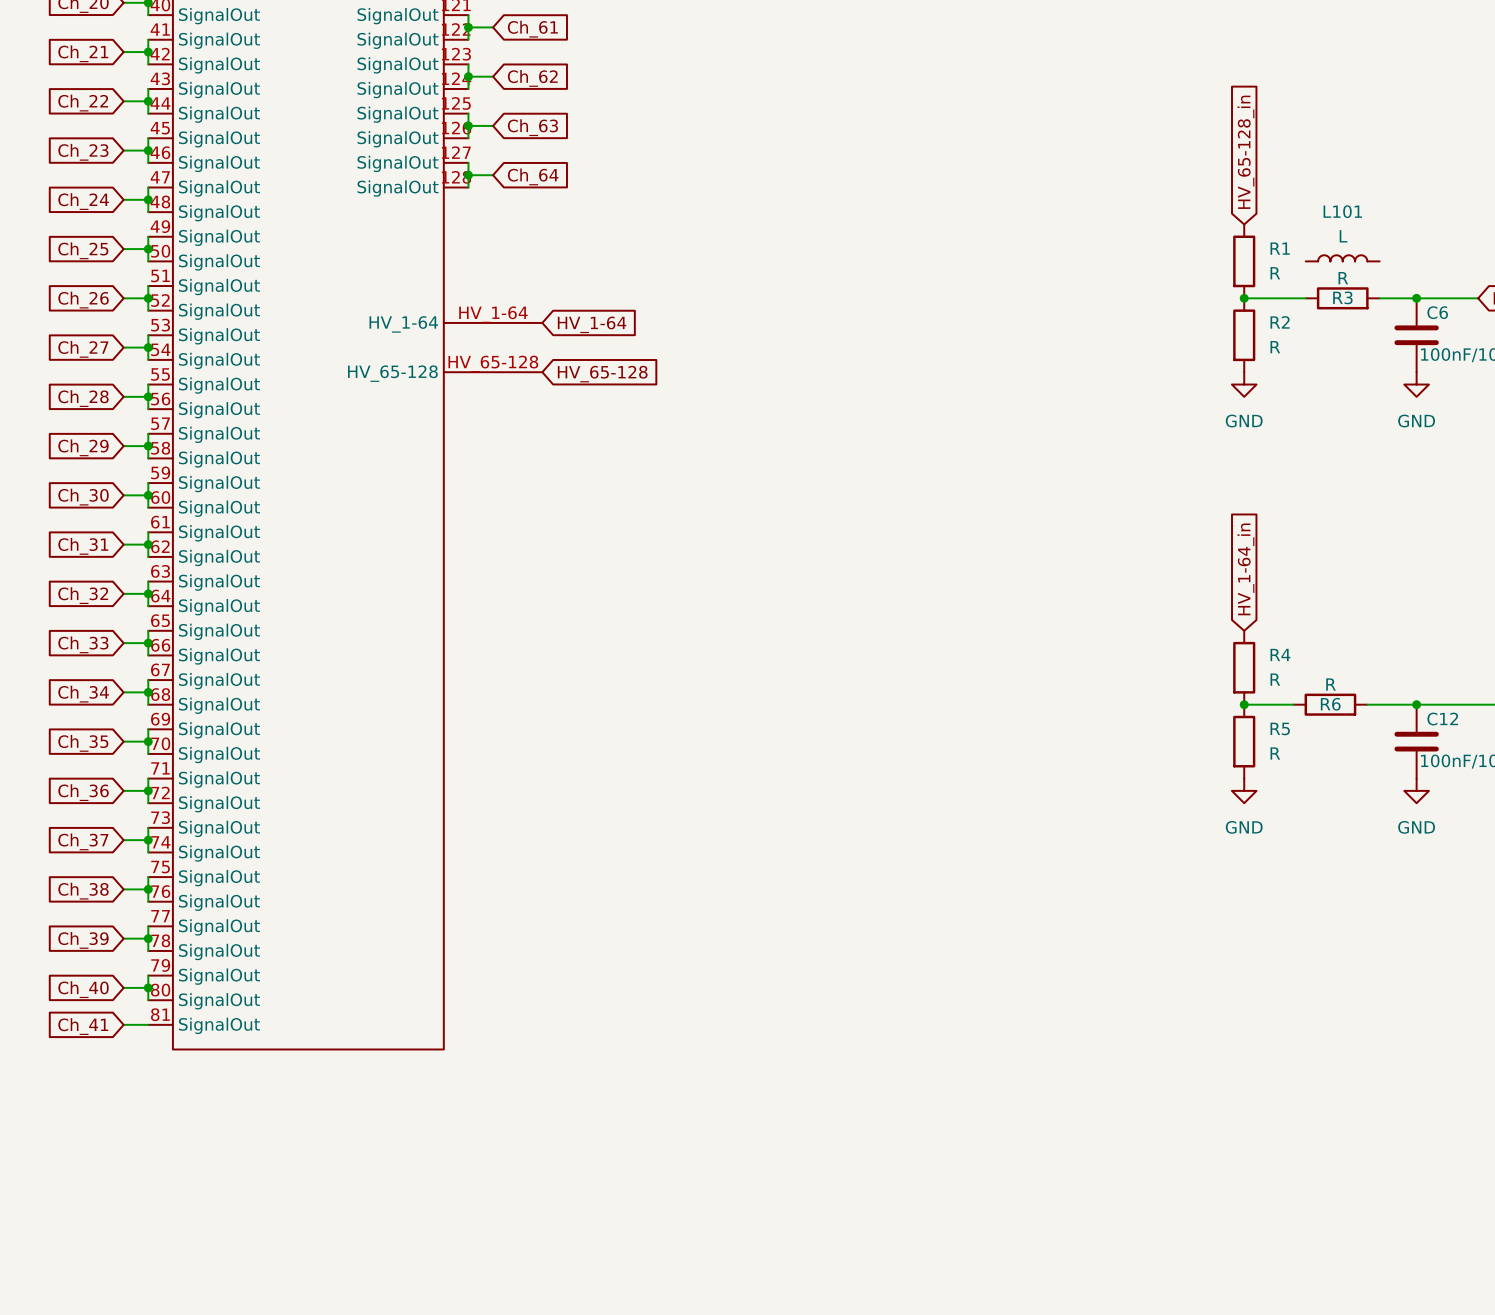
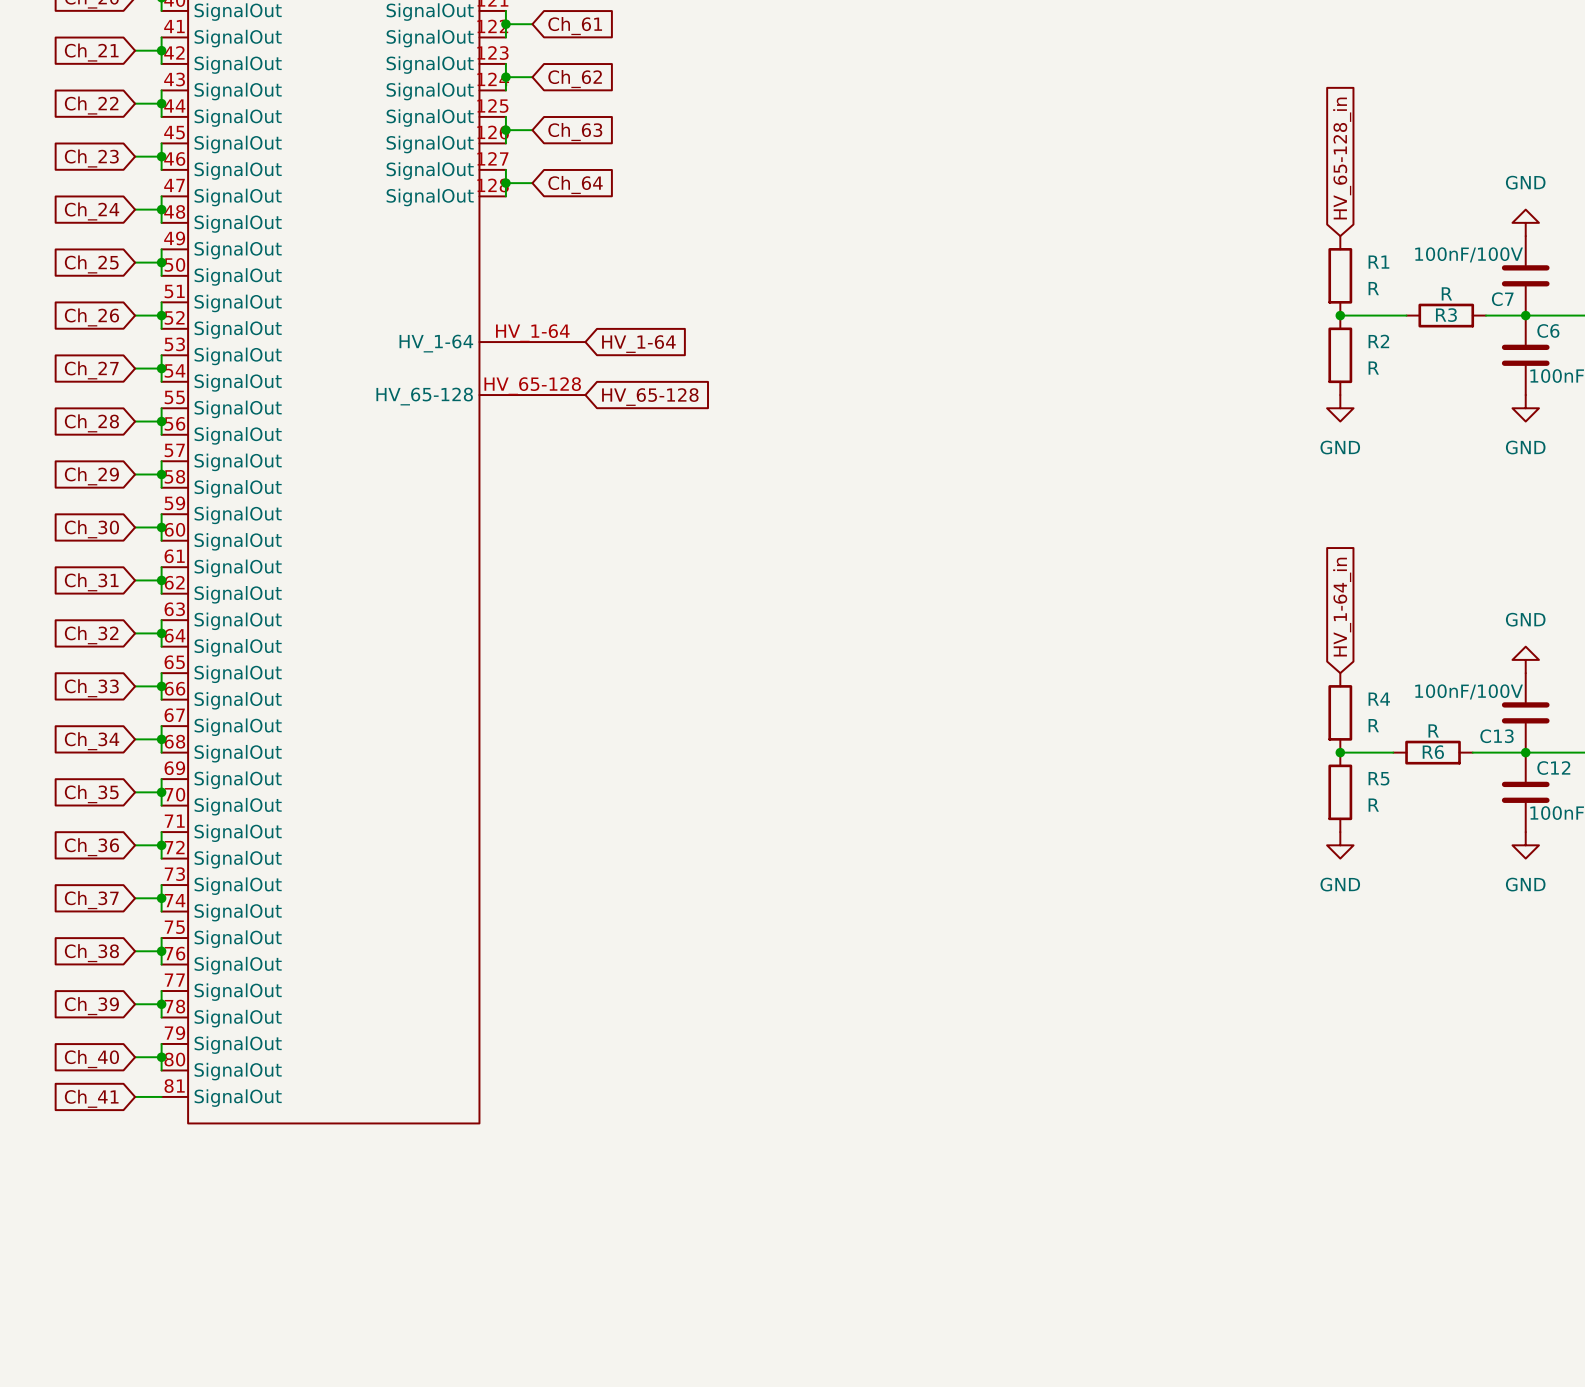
power symbol: none -> GND (1525, 222)
L101: L (1342, 258) -> none
C7: none -> 100nF/100V (1525, 275)
power symbol: none -> GND (1525, 659)
C13: none -> 100nF/100V (1525, 712)

